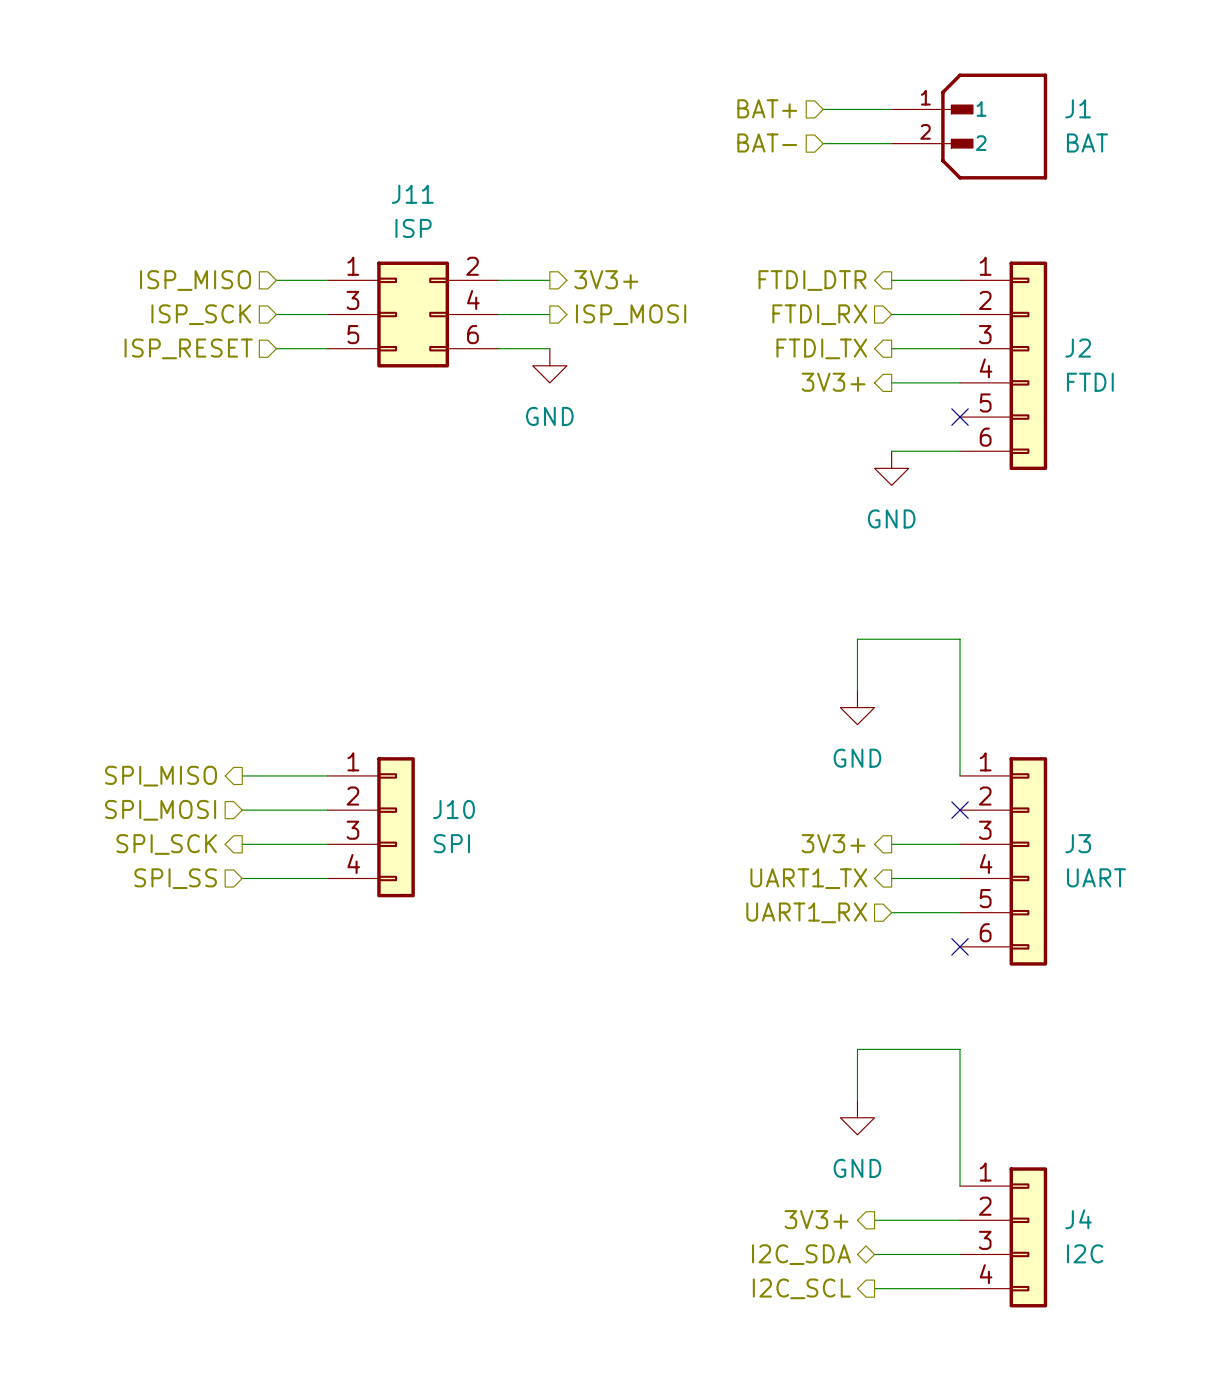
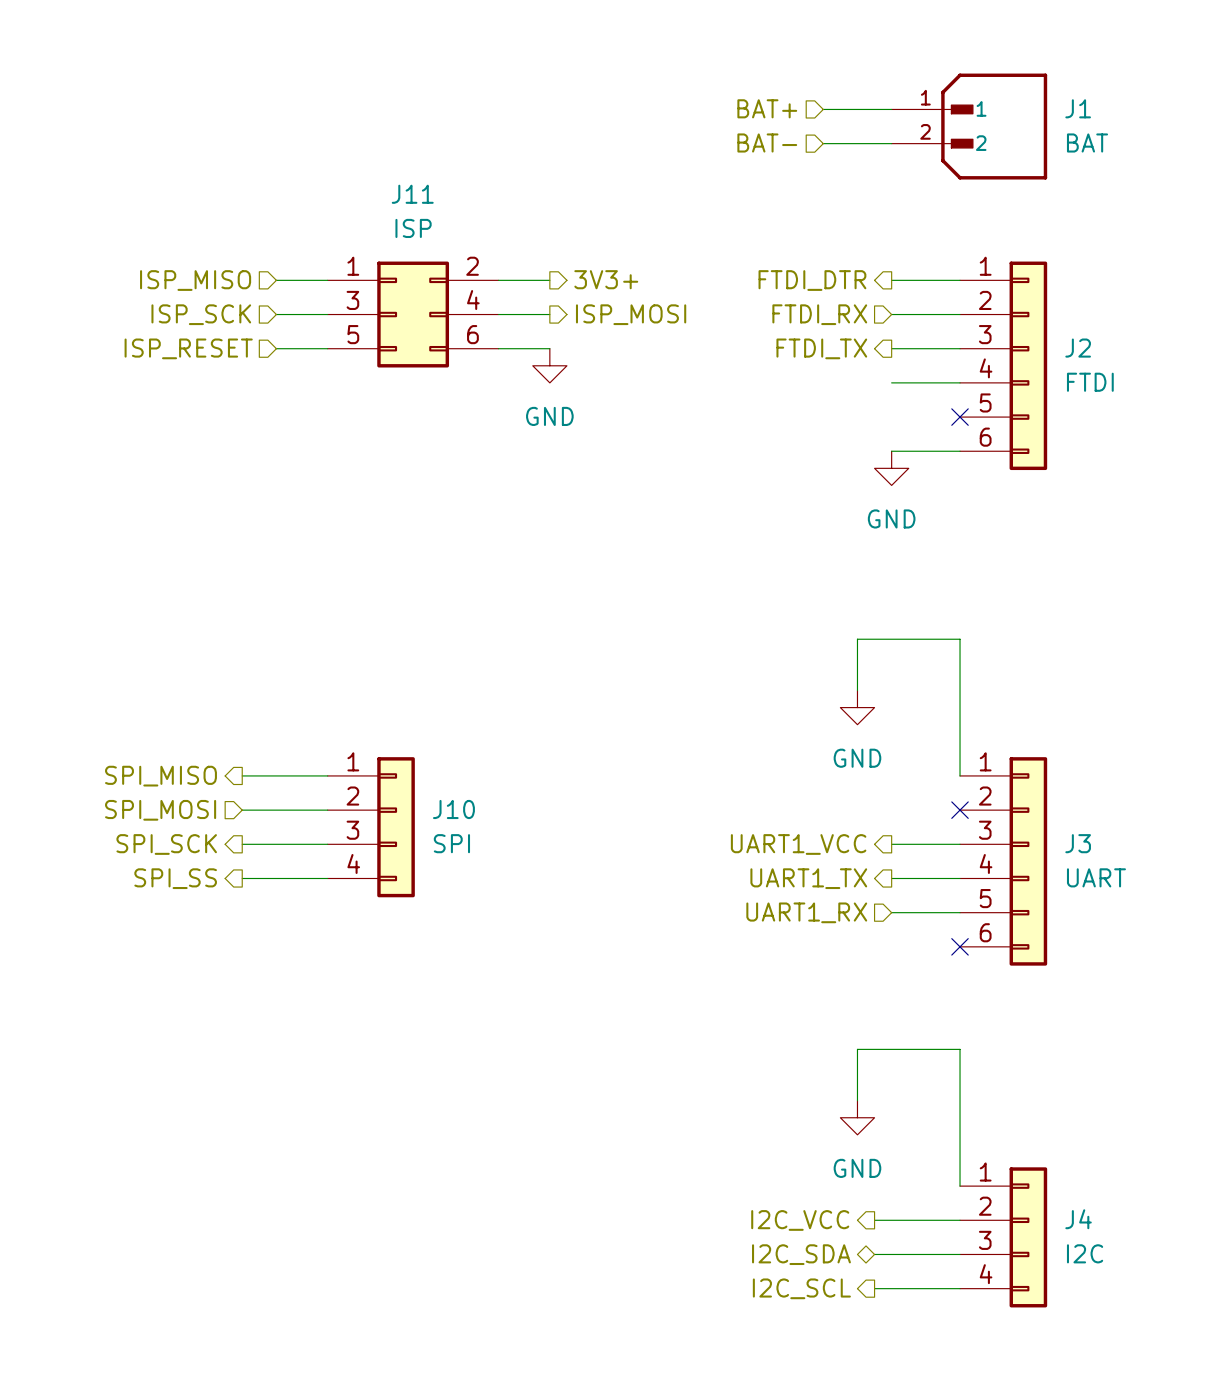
hierarchical label: 3V3+ (833, 382) -> none
hierarchical label: 3V3+ (833, 843) -> UART1_VCC (798, 844)
hierarchical label shape: input (175, 878) -> output (175, 878)
hierarchical label: 3V3+ (816, 1219) -> I2C_VCC (800, 1220)

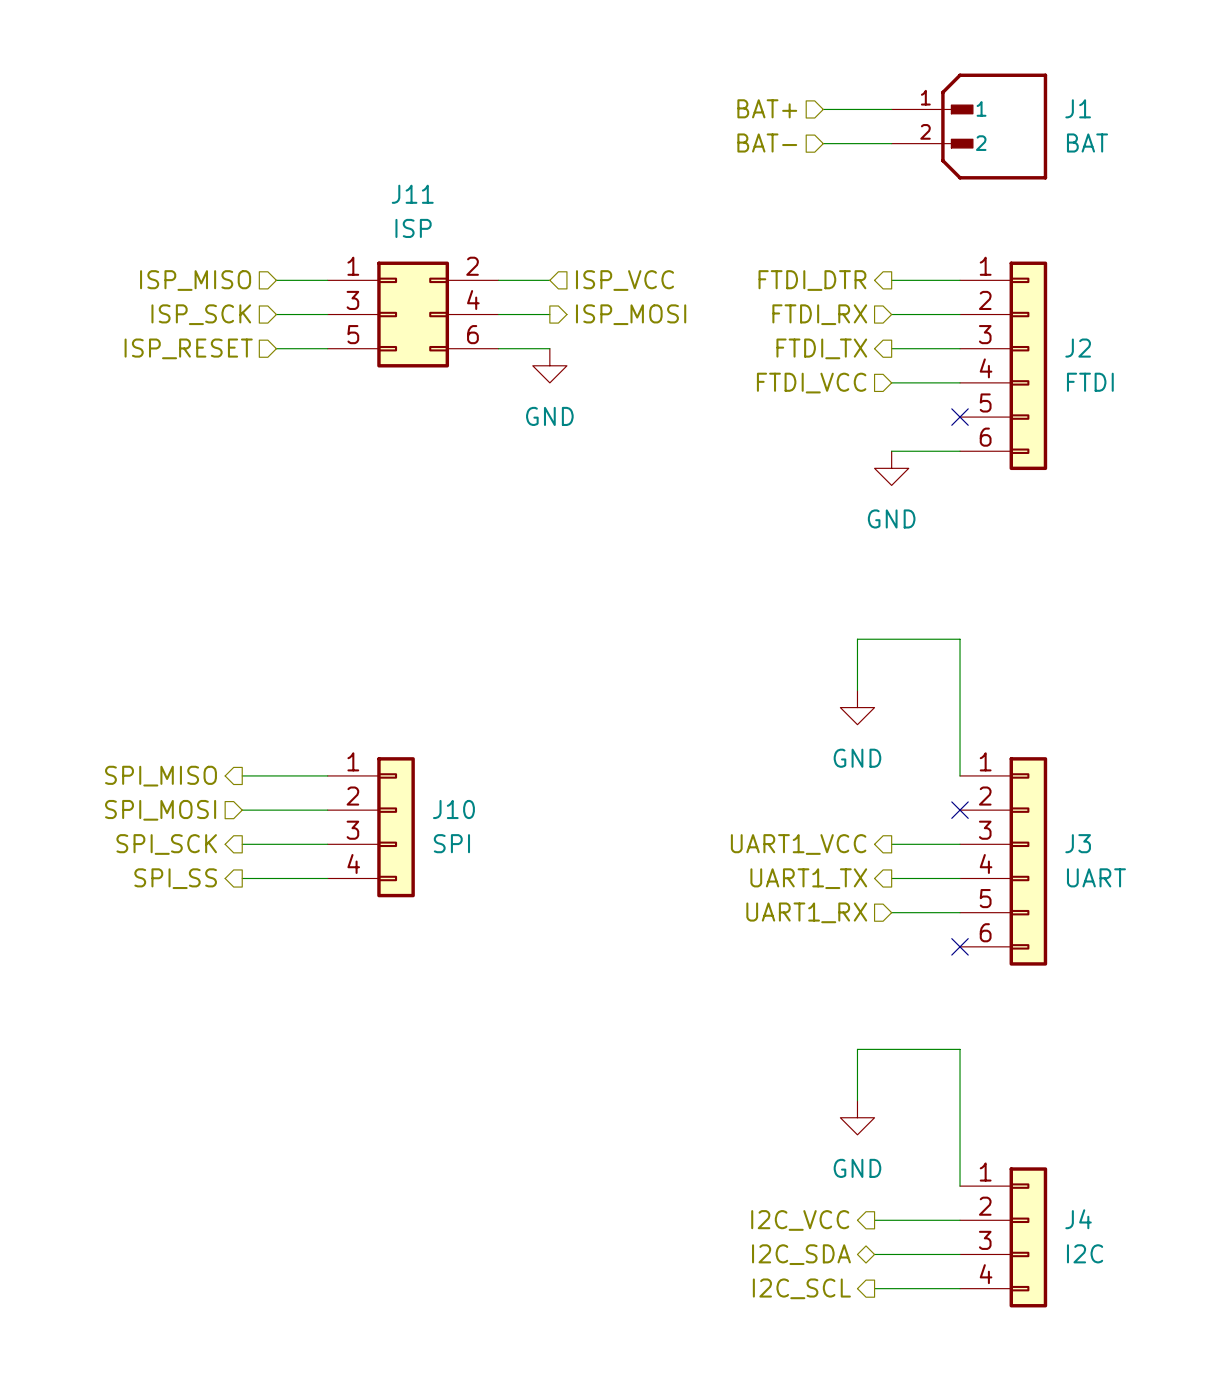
hierarchical label shape: output (606, 279) -> input (624, 280)
hierarchical label: 3V3+ (606, 279) -> ISP_VCC (624, 280)
hierarchical label: none -> FTDI_VCC (811, 383)

